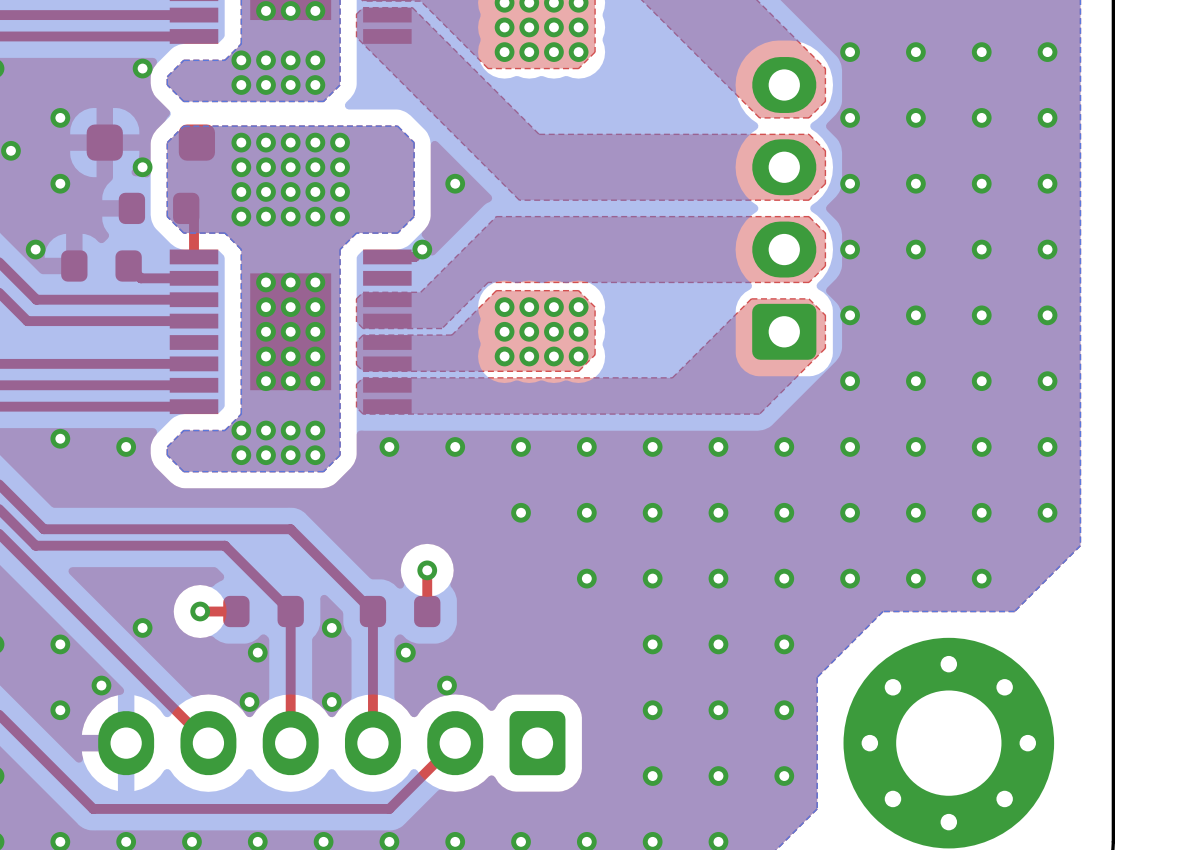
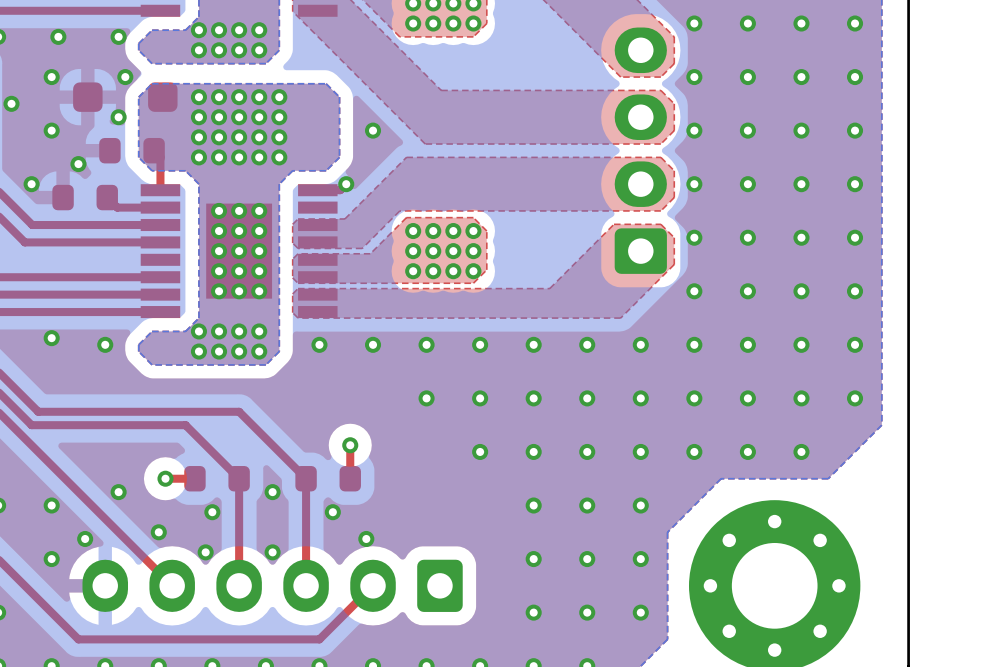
via: none -> (58, 36)
via: none -> (125, 77)
via: none -> (78, 164)
via: none -> (158, 532)

